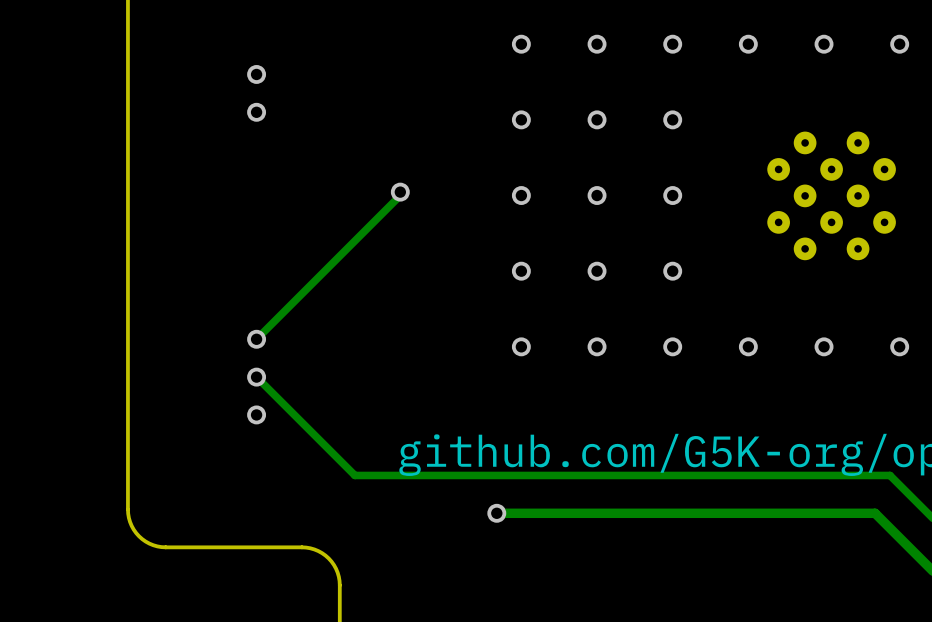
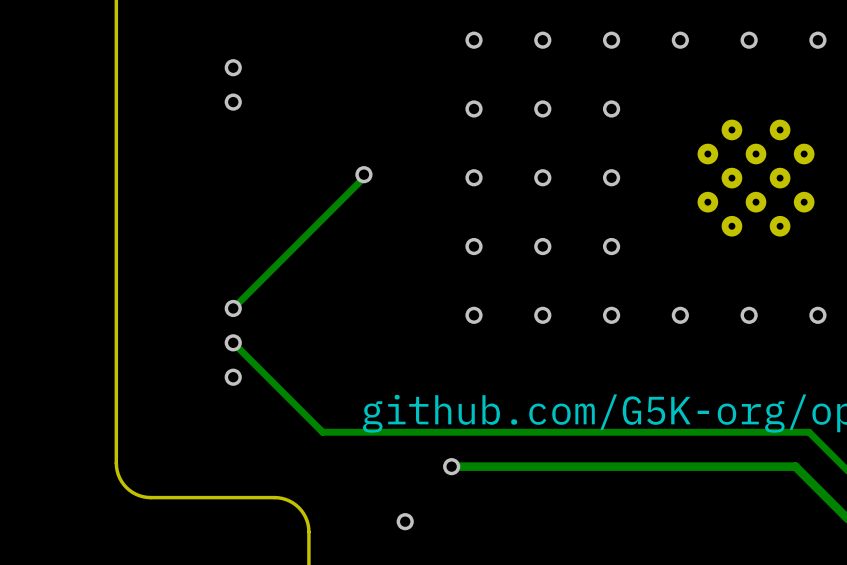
via: none -> (405, 521)

